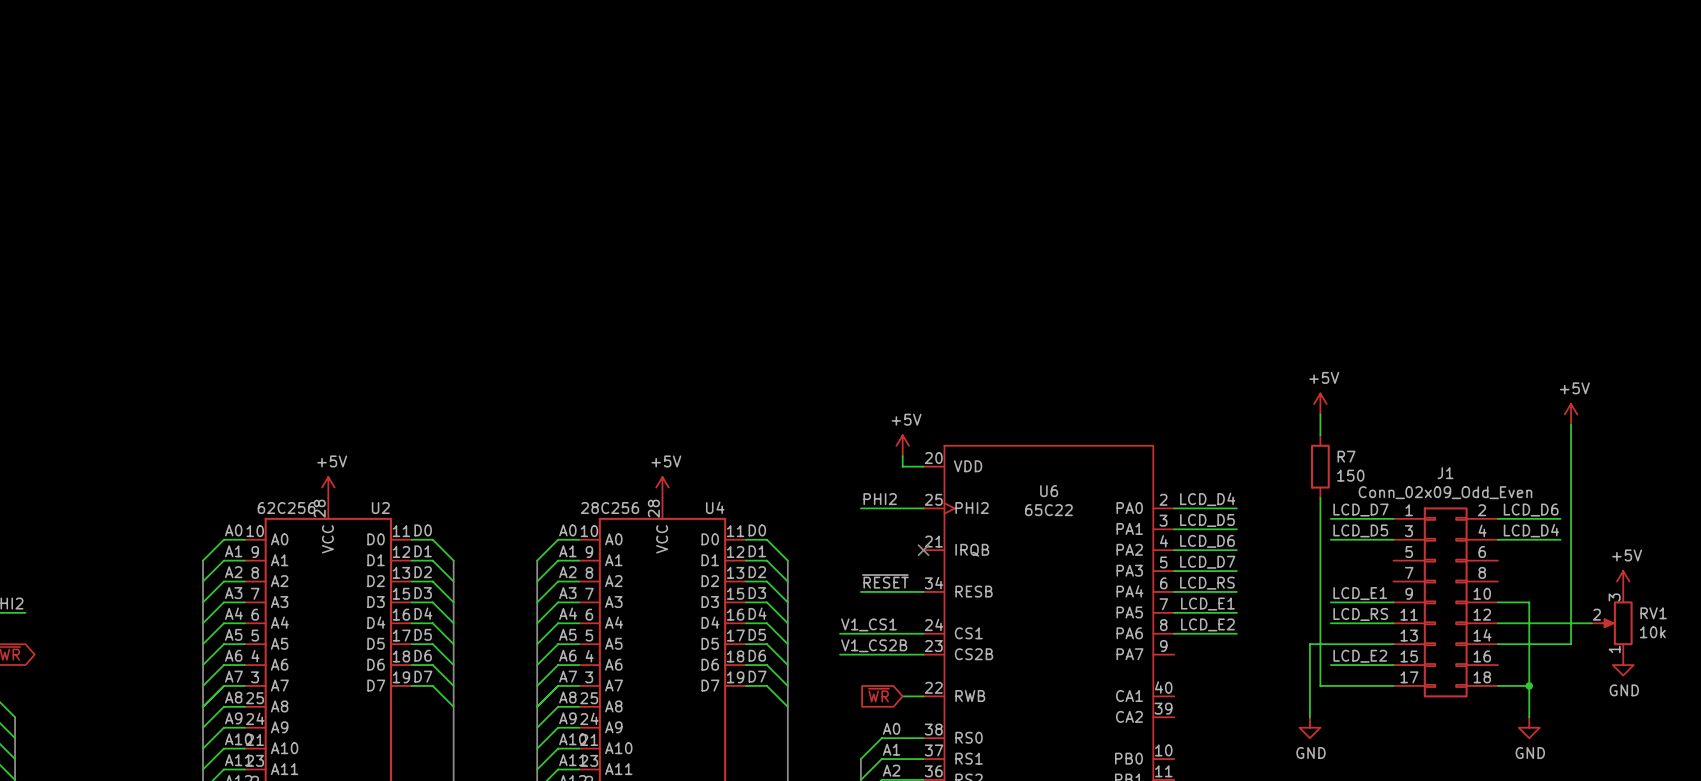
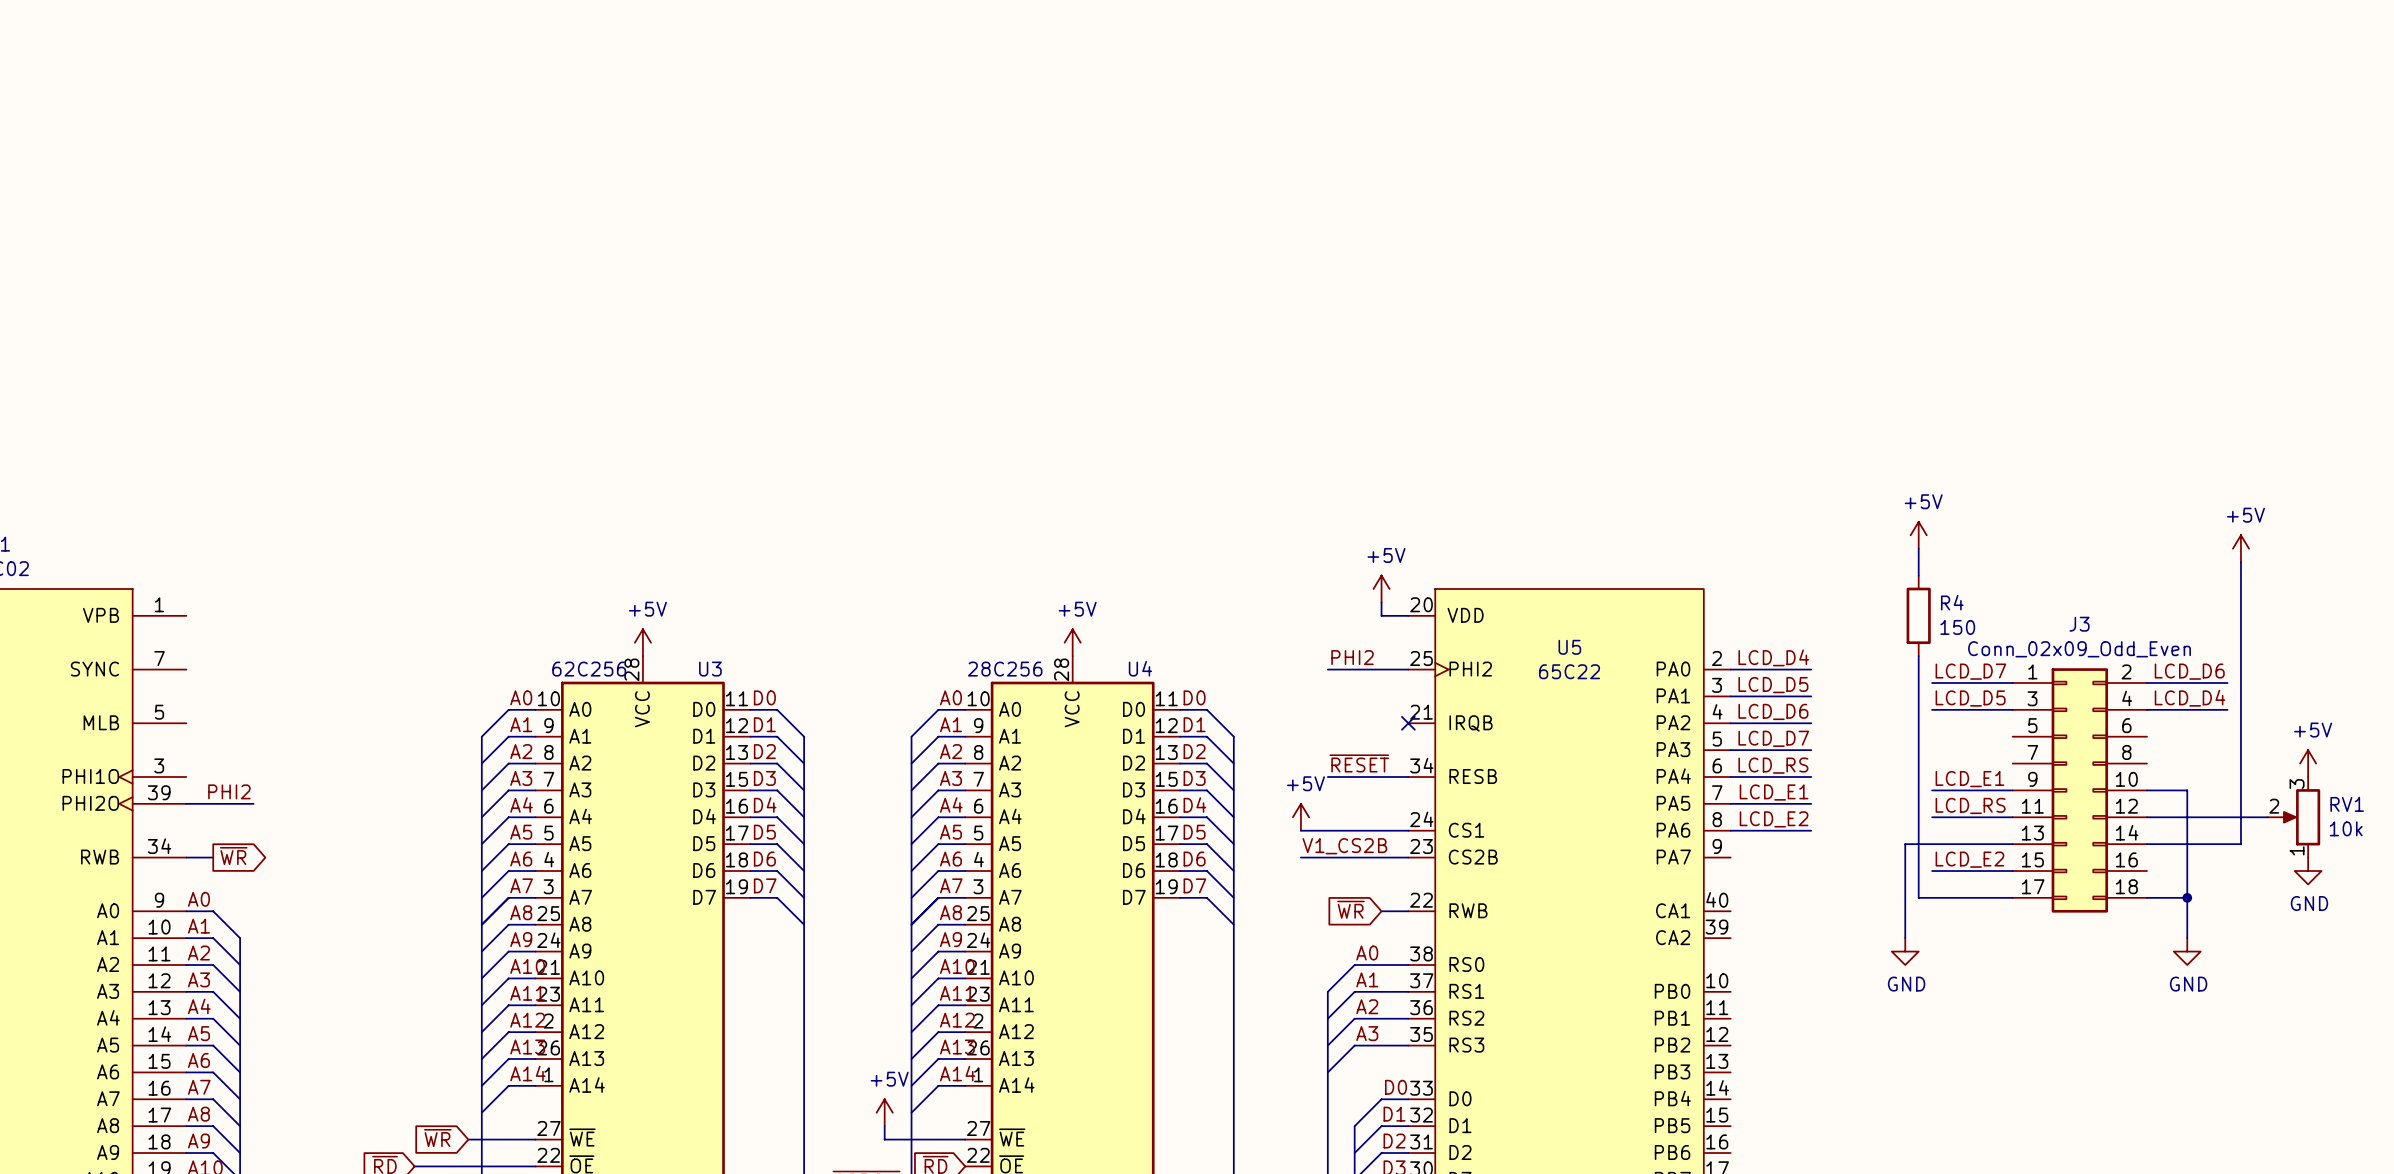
R7 name: R7 (1346, 456) -> R4 (1952, 602)
J1 name: J1 (1445, 473) -> J3 (2079, 624)
U6 name: U6 (1049, 491) -> U5 (1569, 647)
U2 name: U2 (380, 508) -> U3 (710, 669)
power symbol: none -> +5V (1300, 817)
label: V1_CS1 (868, 624) -> none

